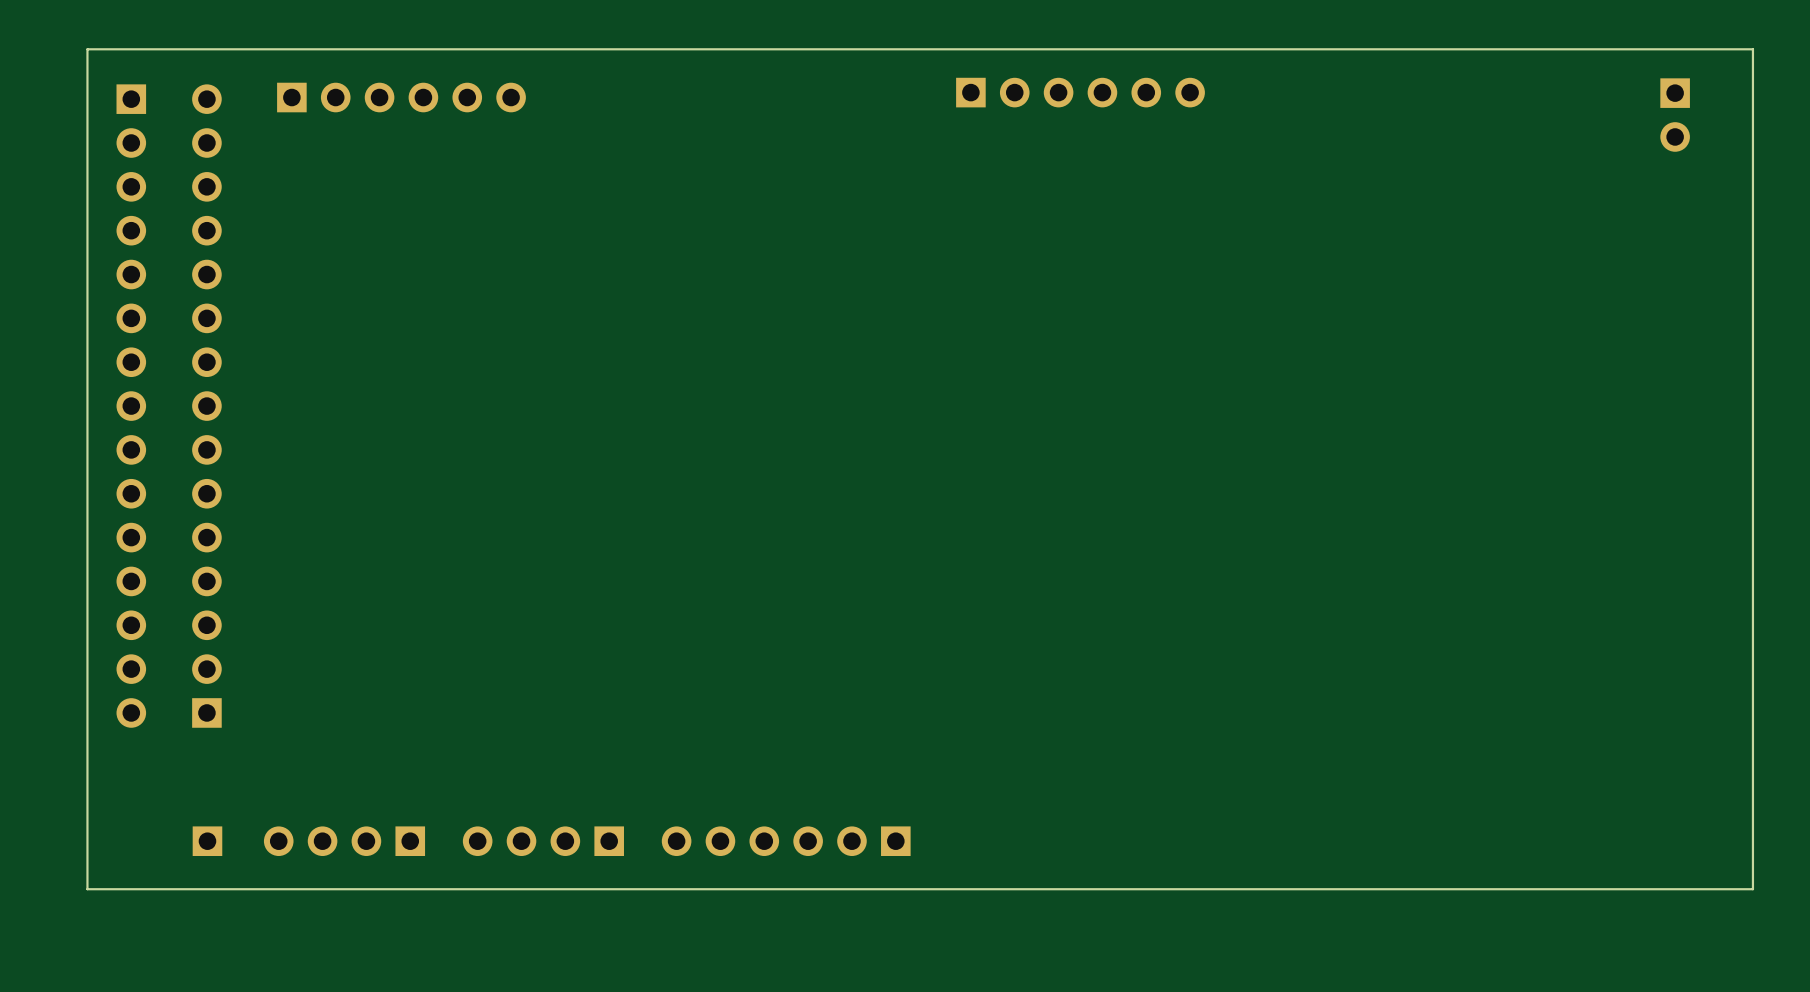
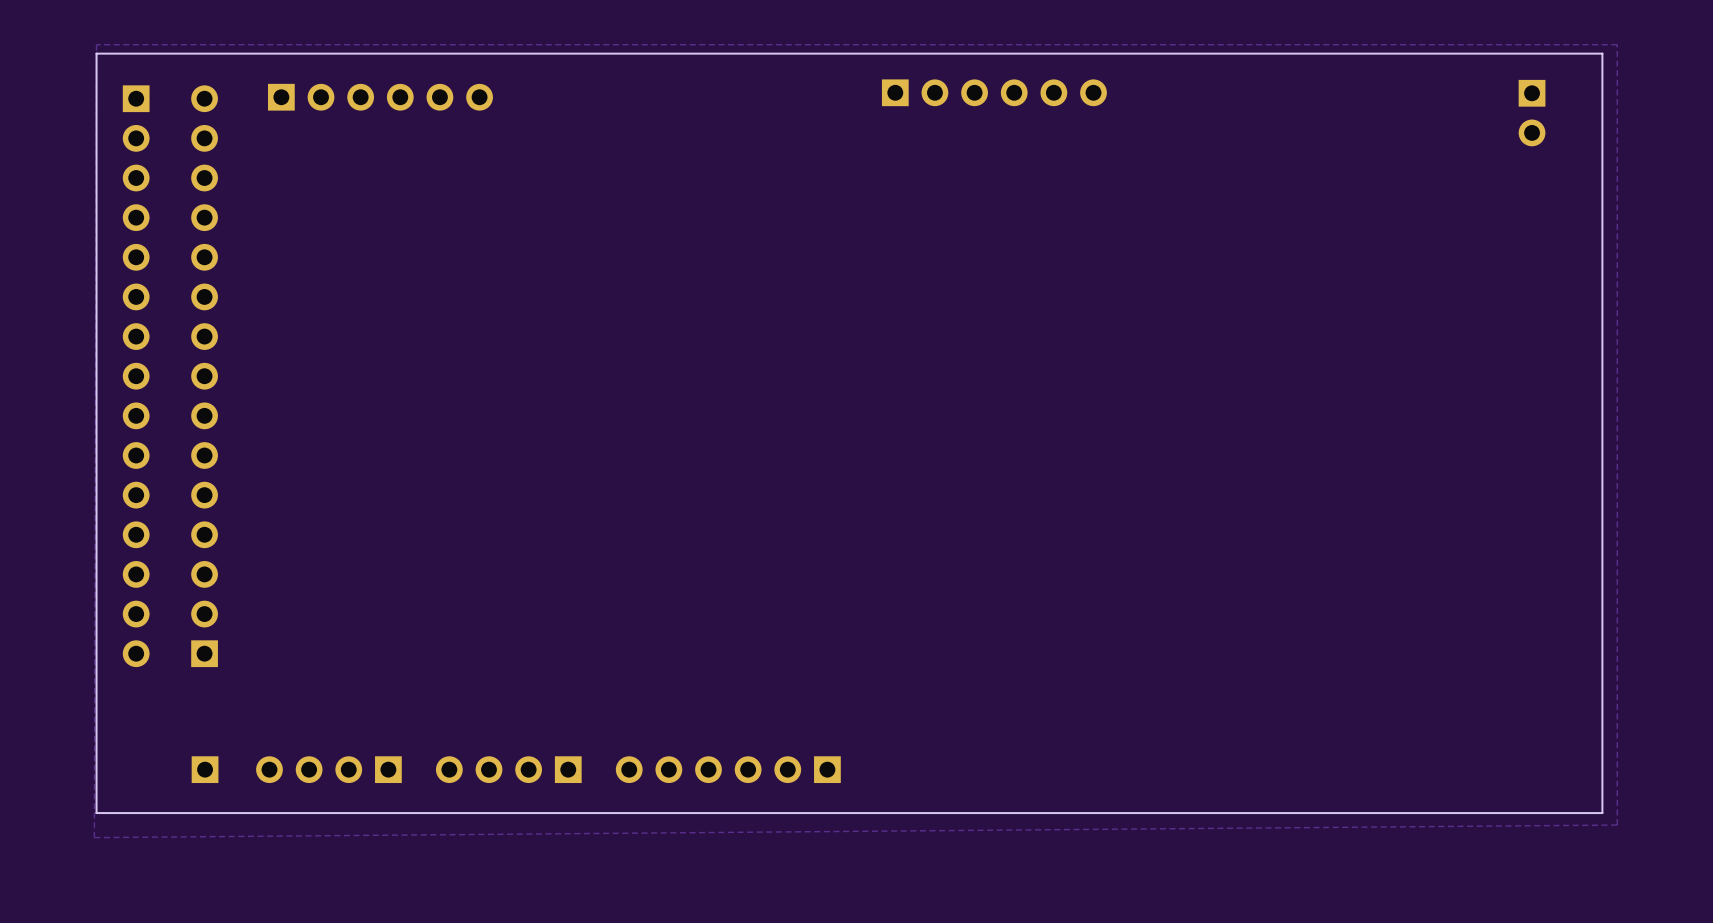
zone outline: none -> (1617, 44) (1617, 825) (94, 837) (96, 44) (1617, 44)

